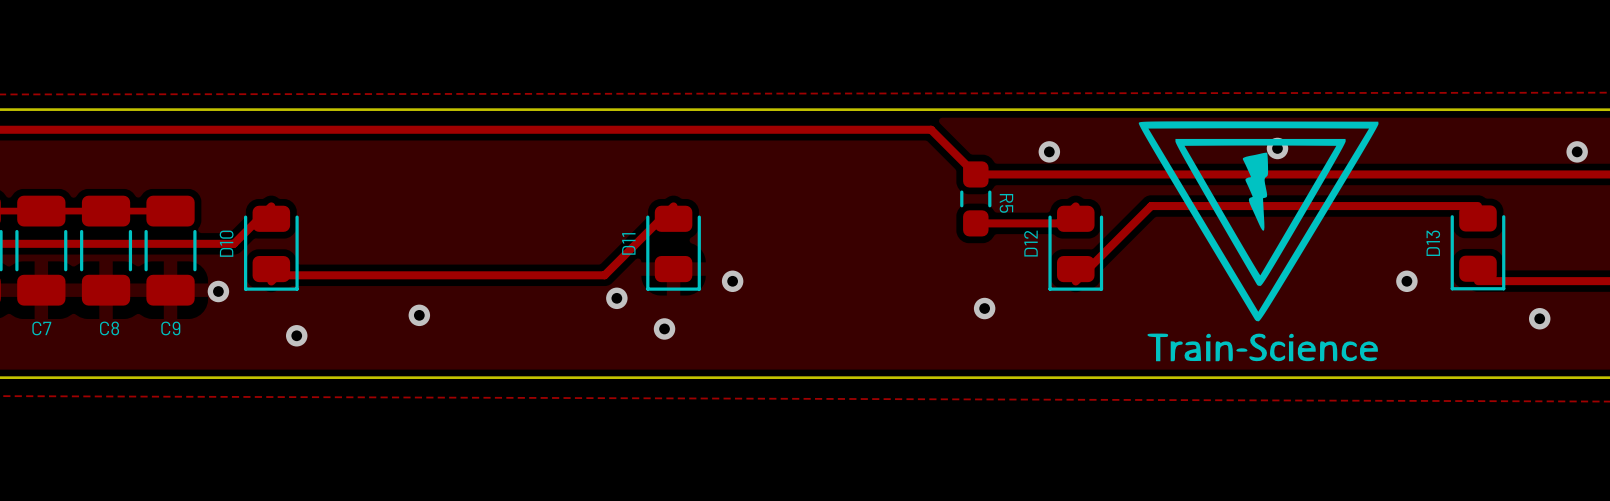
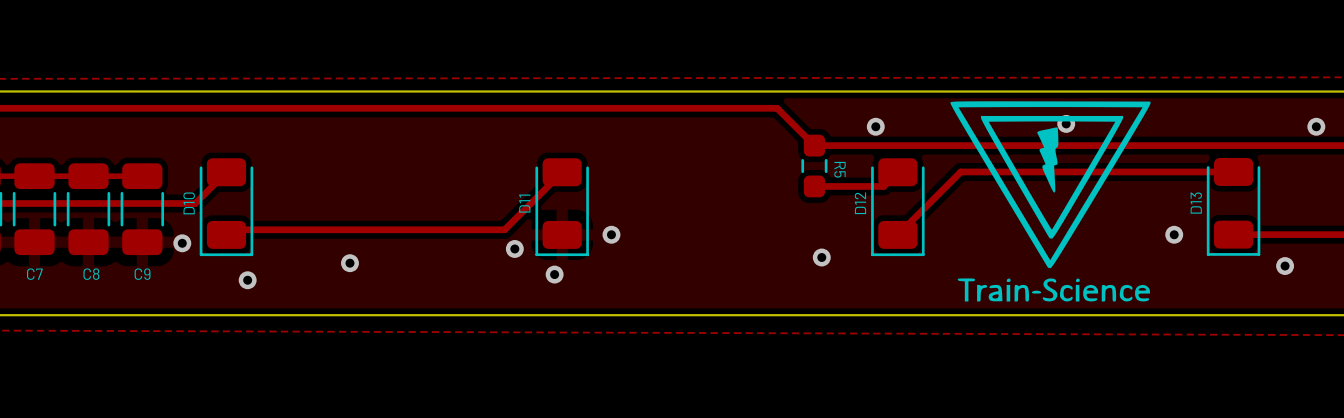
D10 footprint: [243, 205, 299, 291] -> [199, 158, 254, 257]
D11 footprint: [646, 205, 701, 291] -> [535, 158, 589, 257]
D12 footprint: [1048, 205, 1104, 291] -> [871, 158, 925, 257]
D13 footprint: [1450, 205, 1506, 291] -> [1206, 157, 1261, 256]

